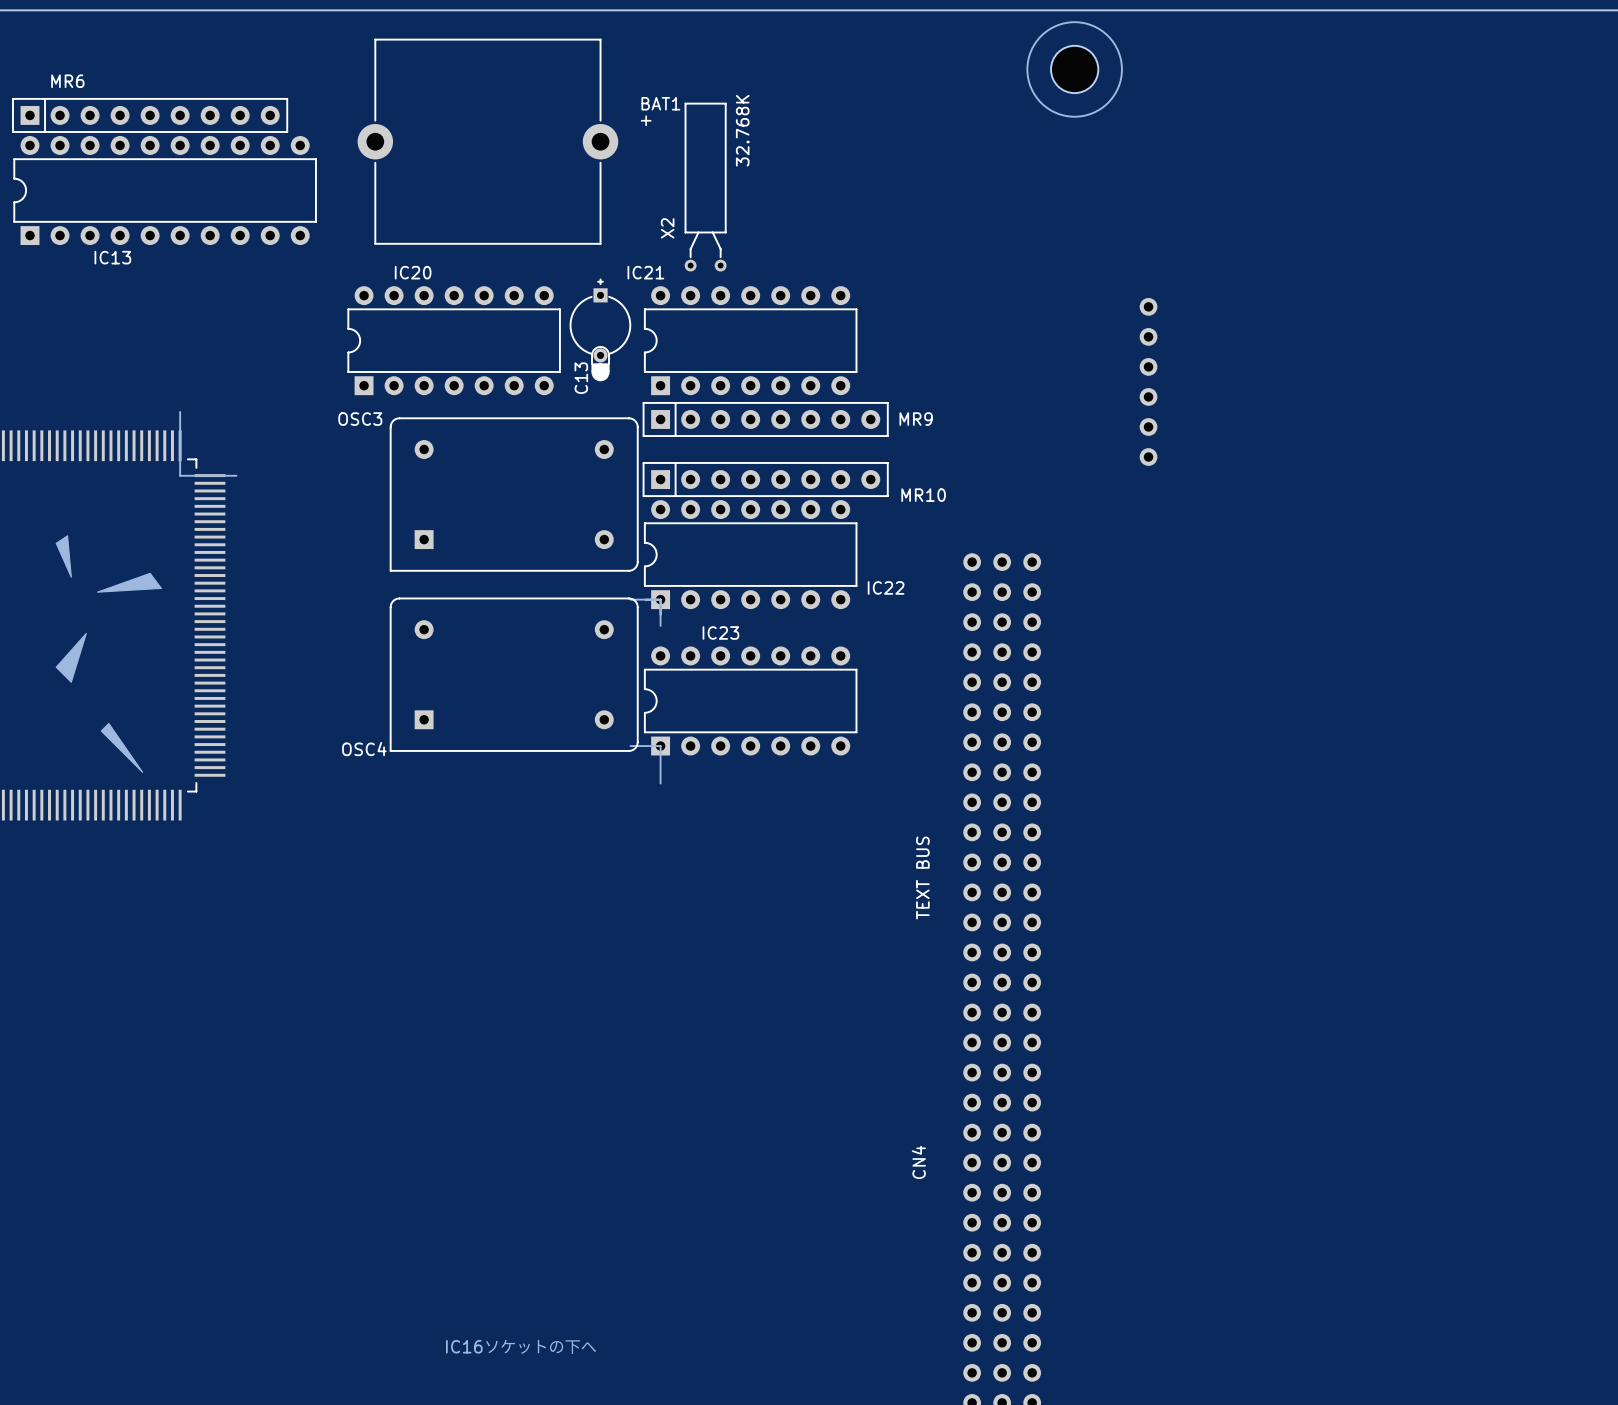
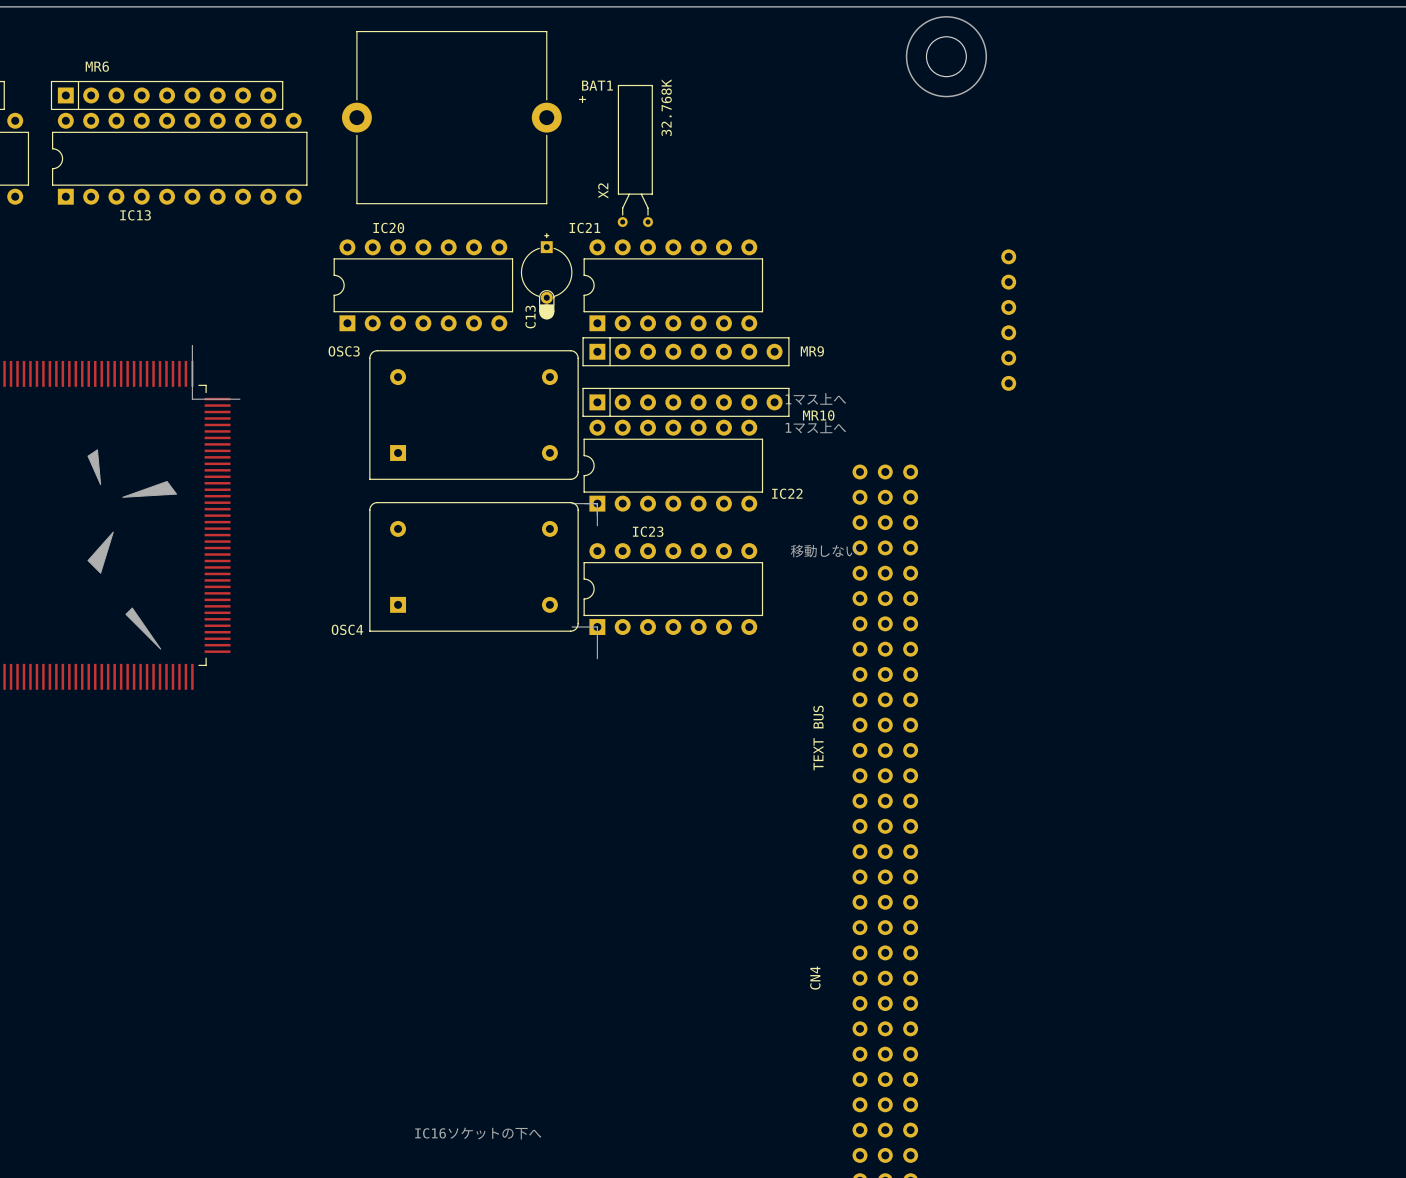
text: none -> 1マス上へ (815, 399)
text: none -> 1マス上へ (815, 427)
text: none -> 移動しない (824, 551)

